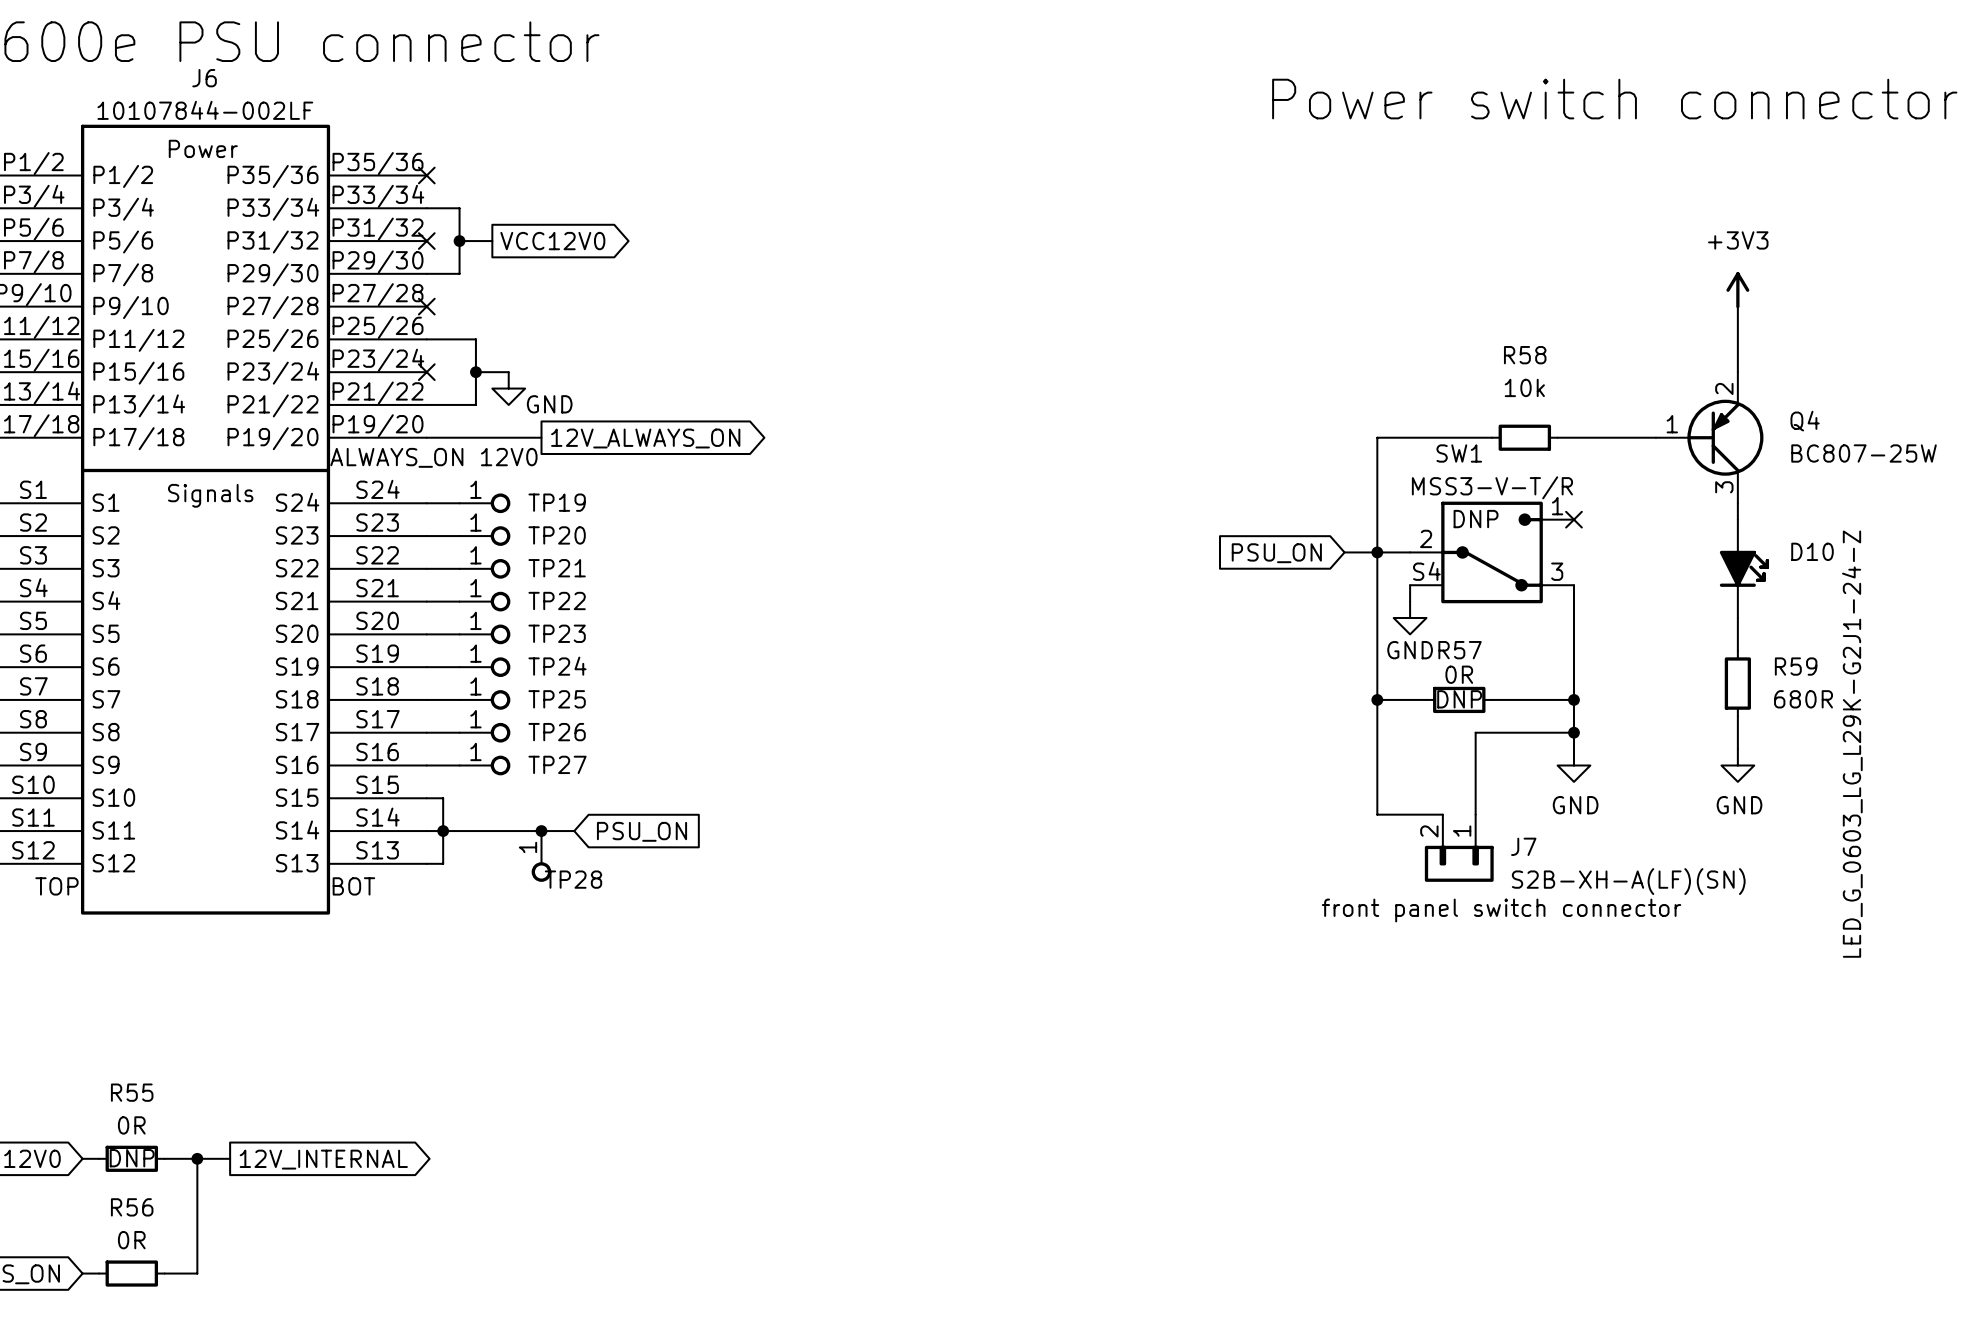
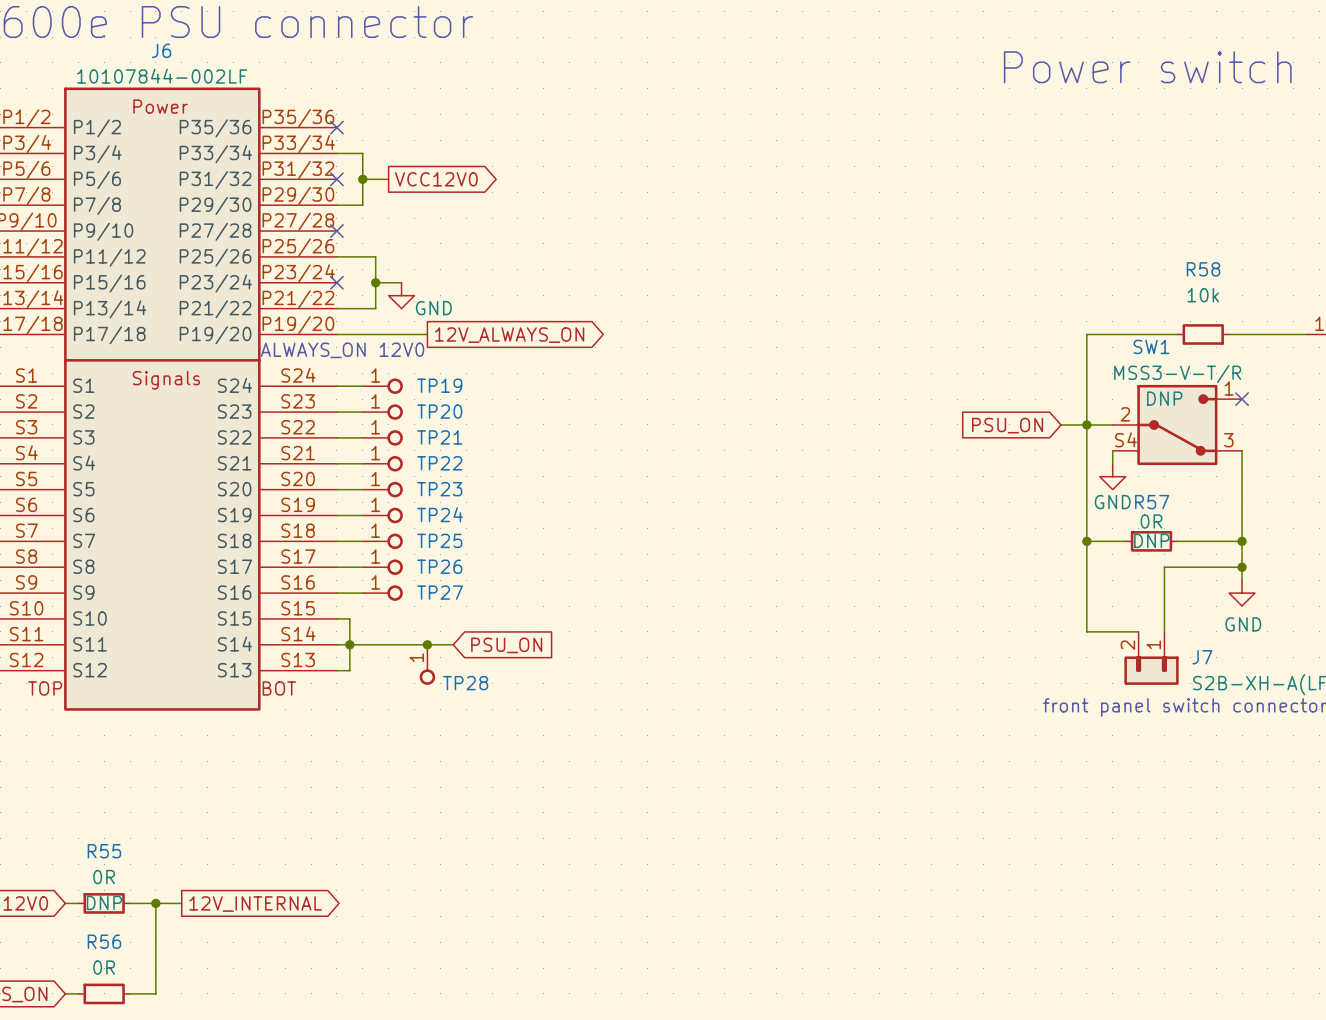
TP28 name position: TP28 (573, 879) -> TP28 (465, 683)

